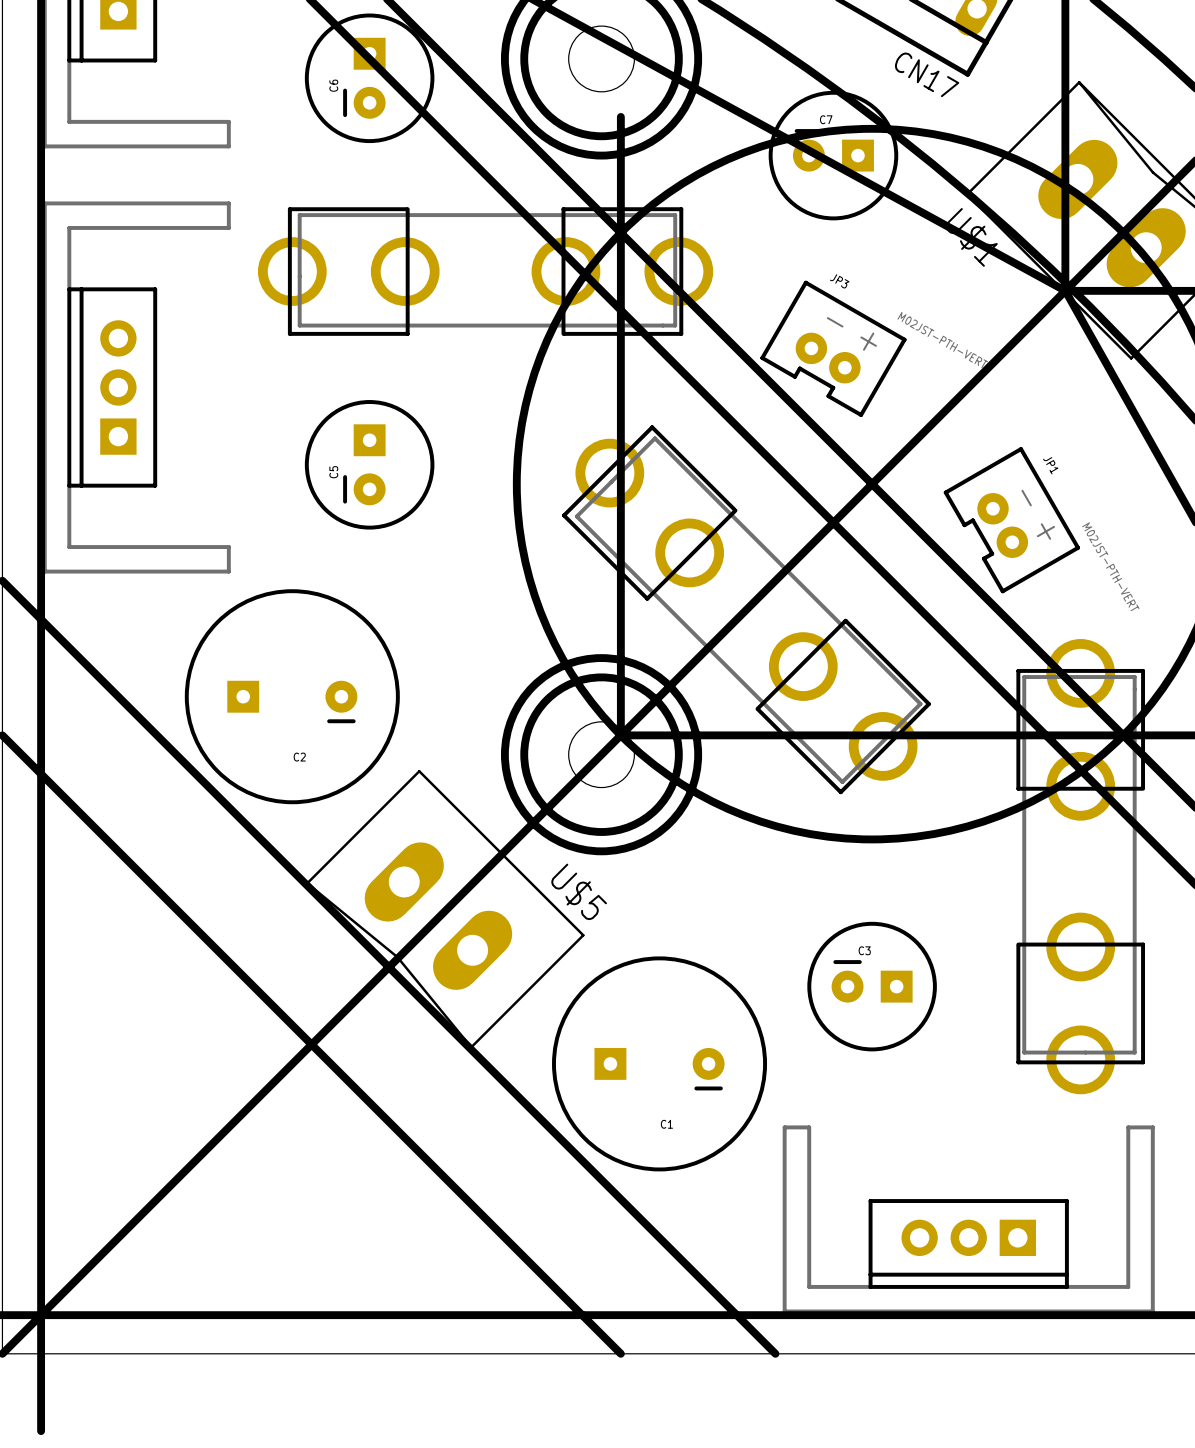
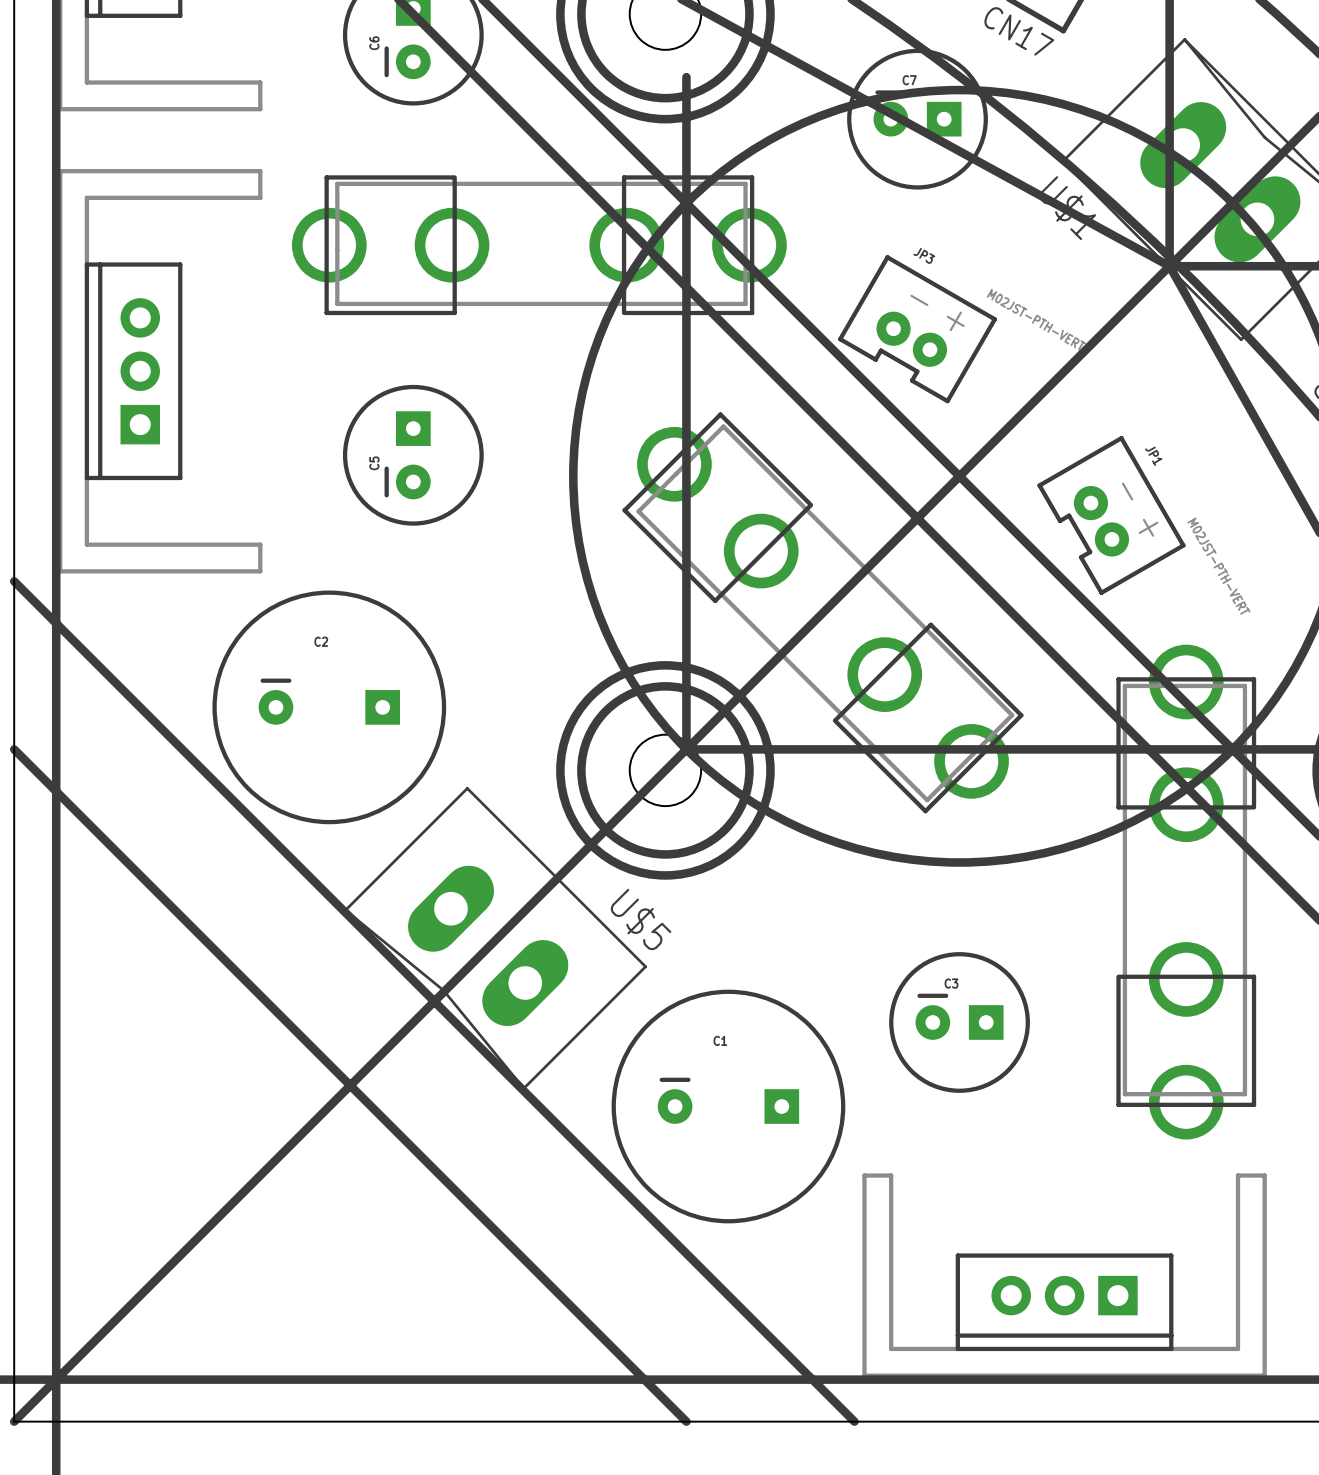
C2 rotation: 0° (292, 696) -> 180° (329, 707)
C1 rotation: 0° (659, 1063) -> 180° (728, 1106)

